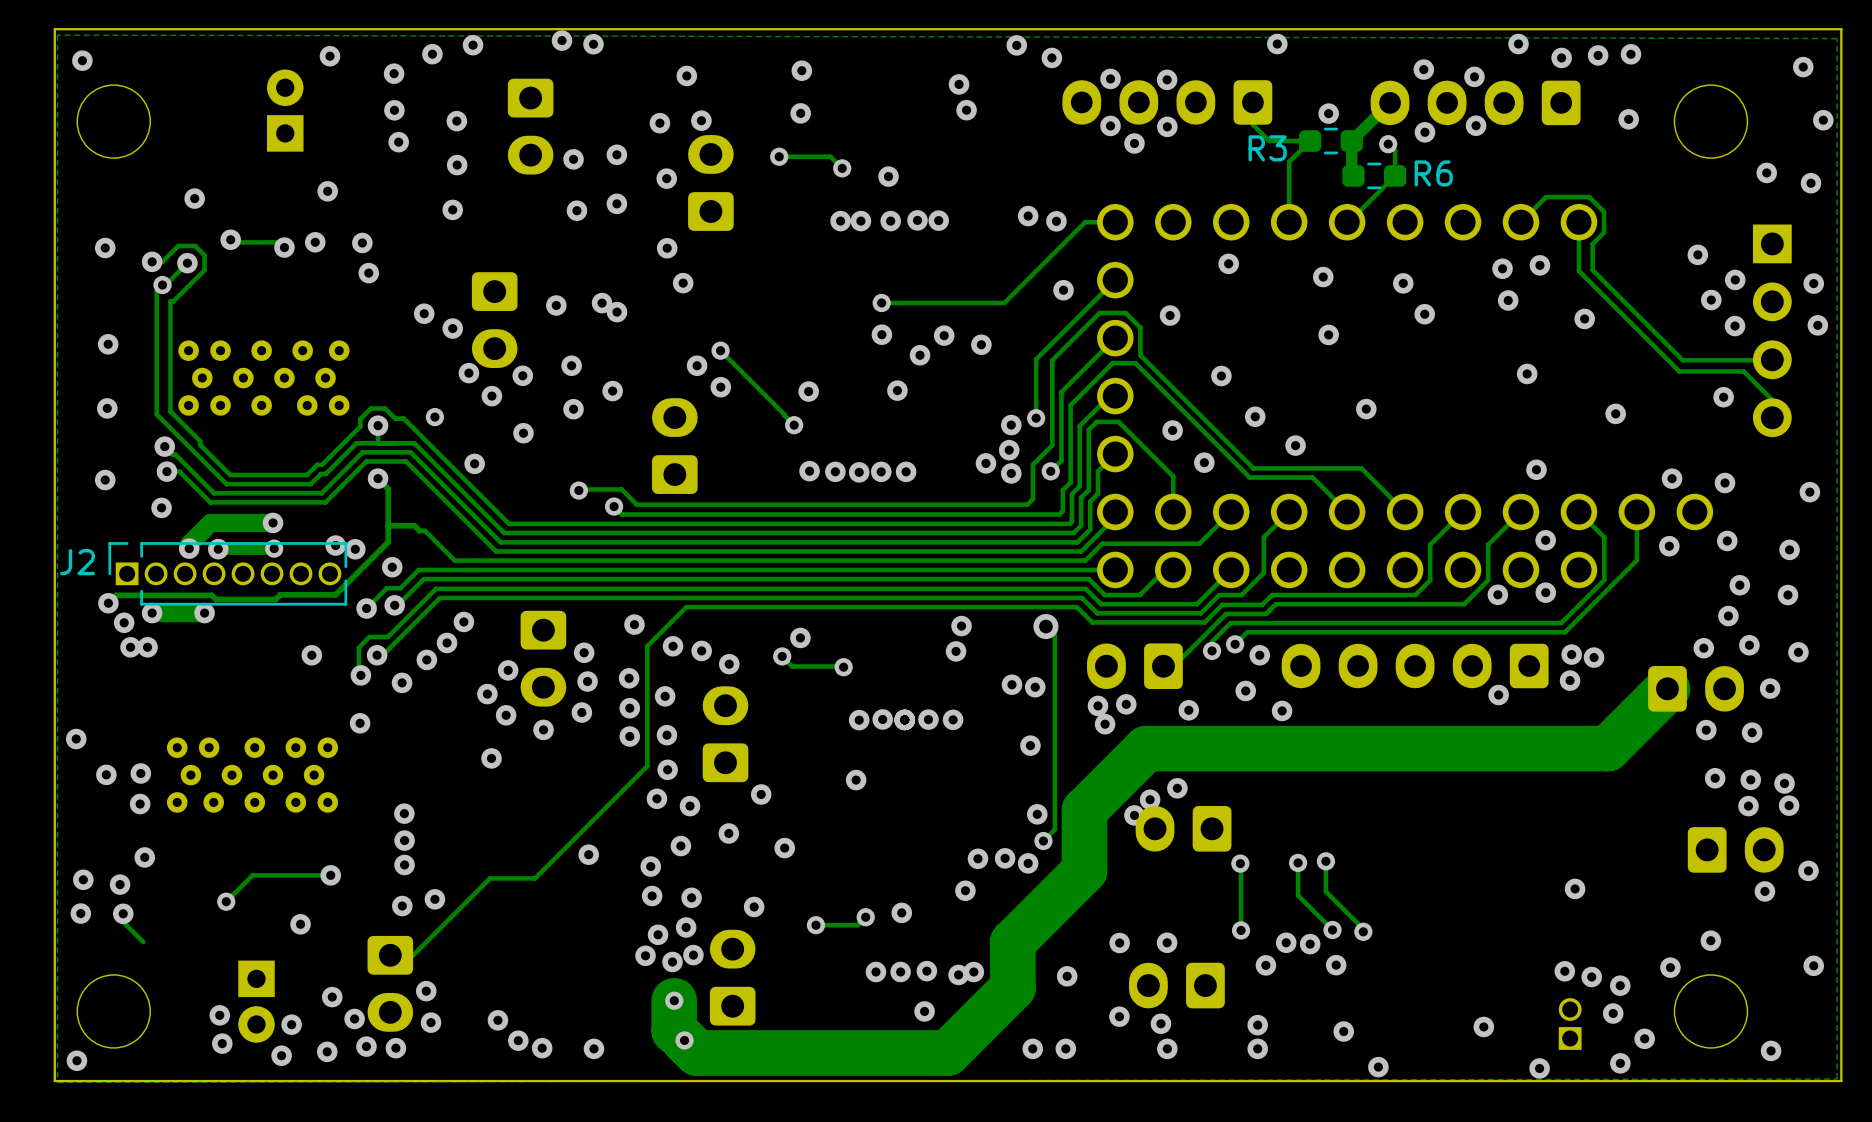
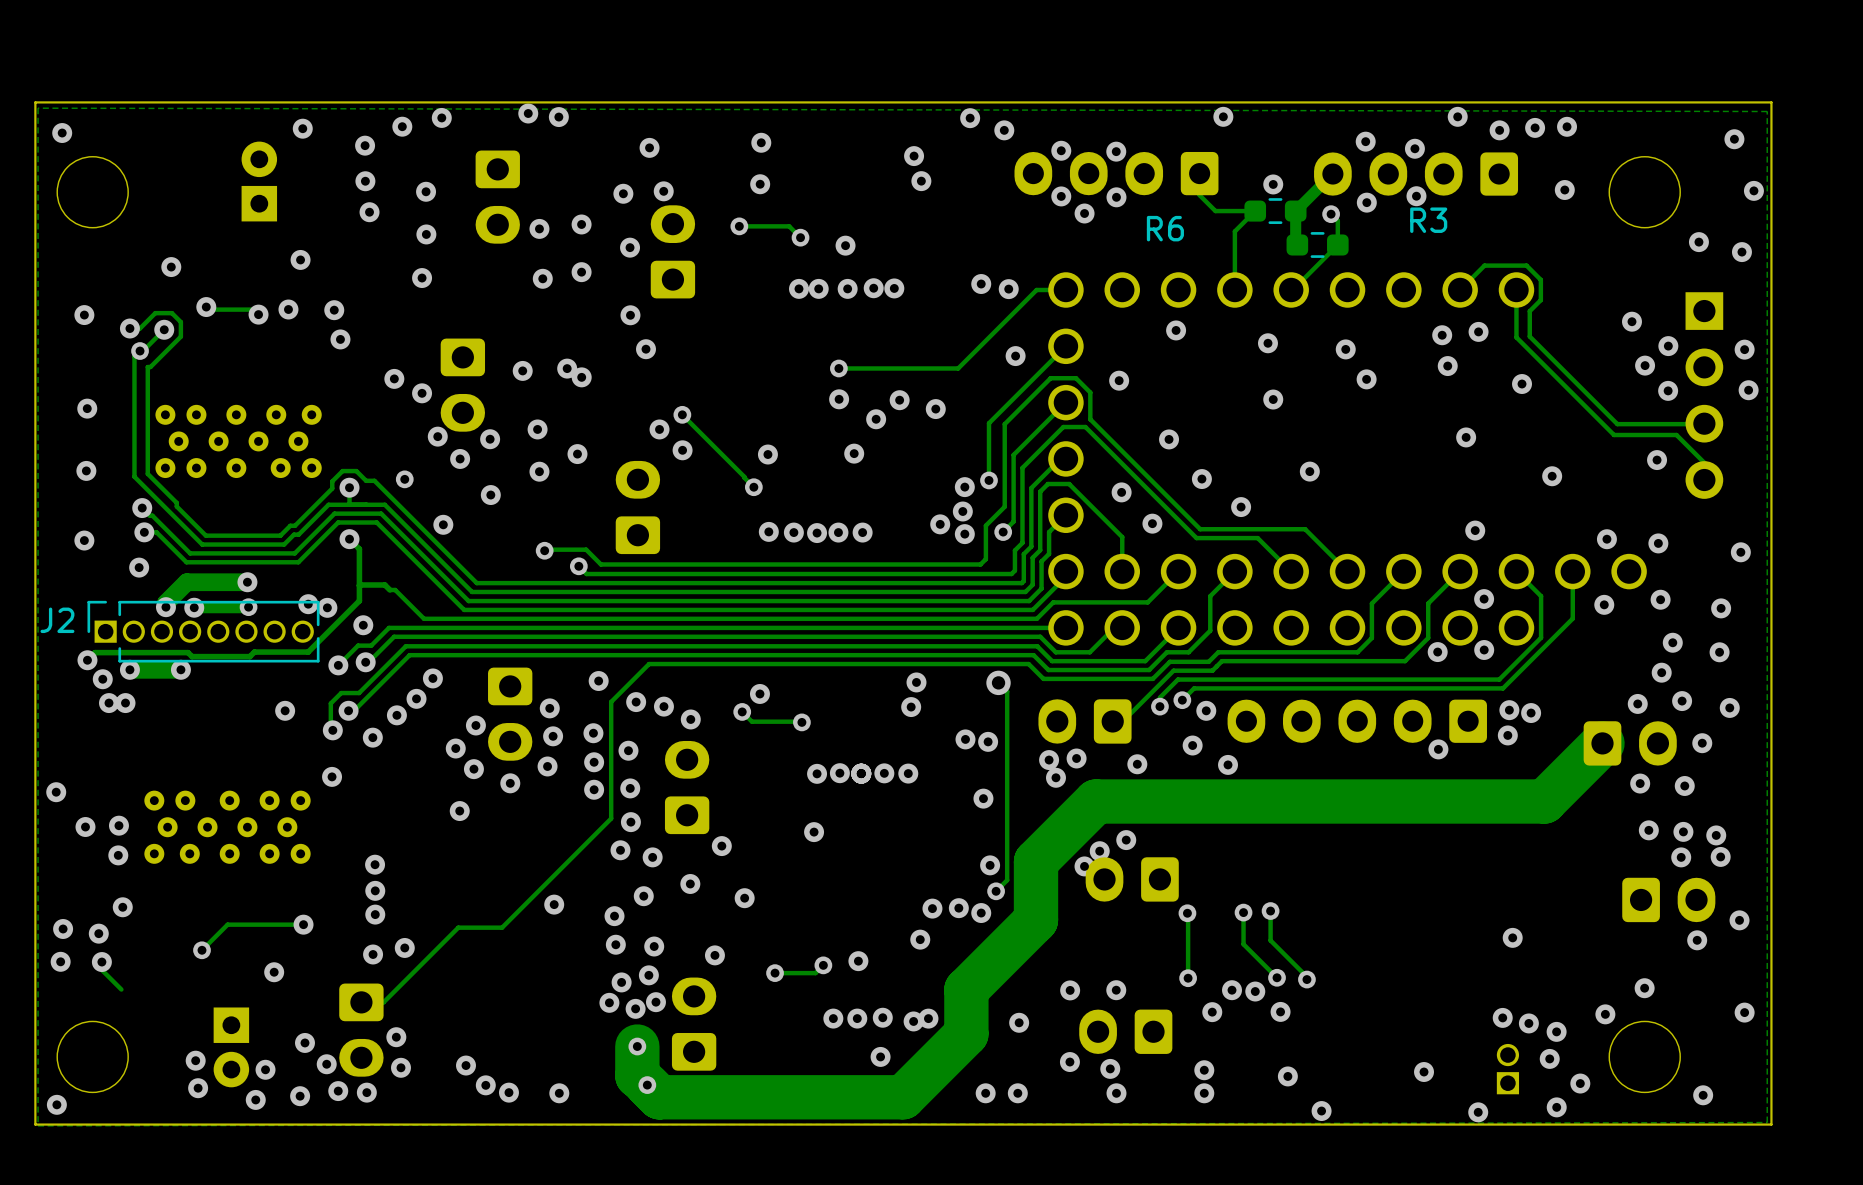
R3 name position: R3 (1267, 148) -> R3 (1428, 220)
R6 name position: R6 (1433, 173) -> R6 (1165, 228)

